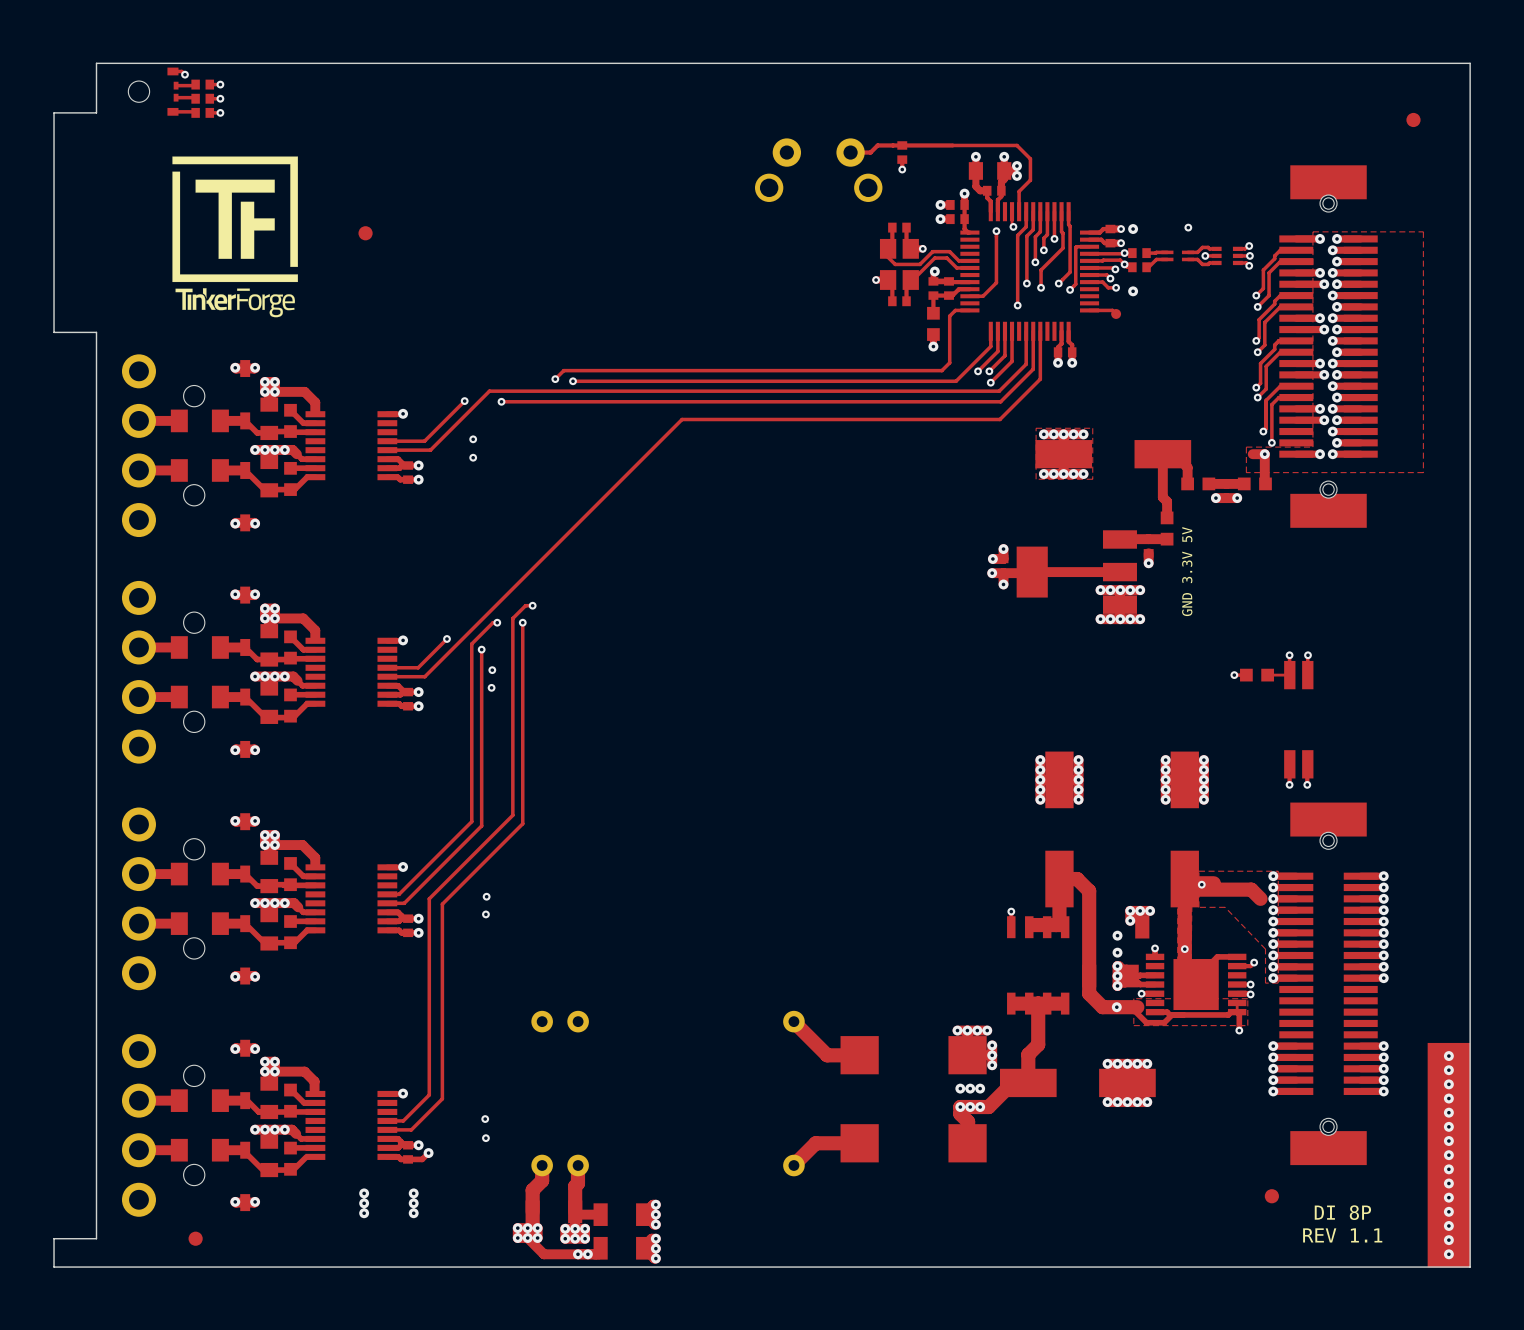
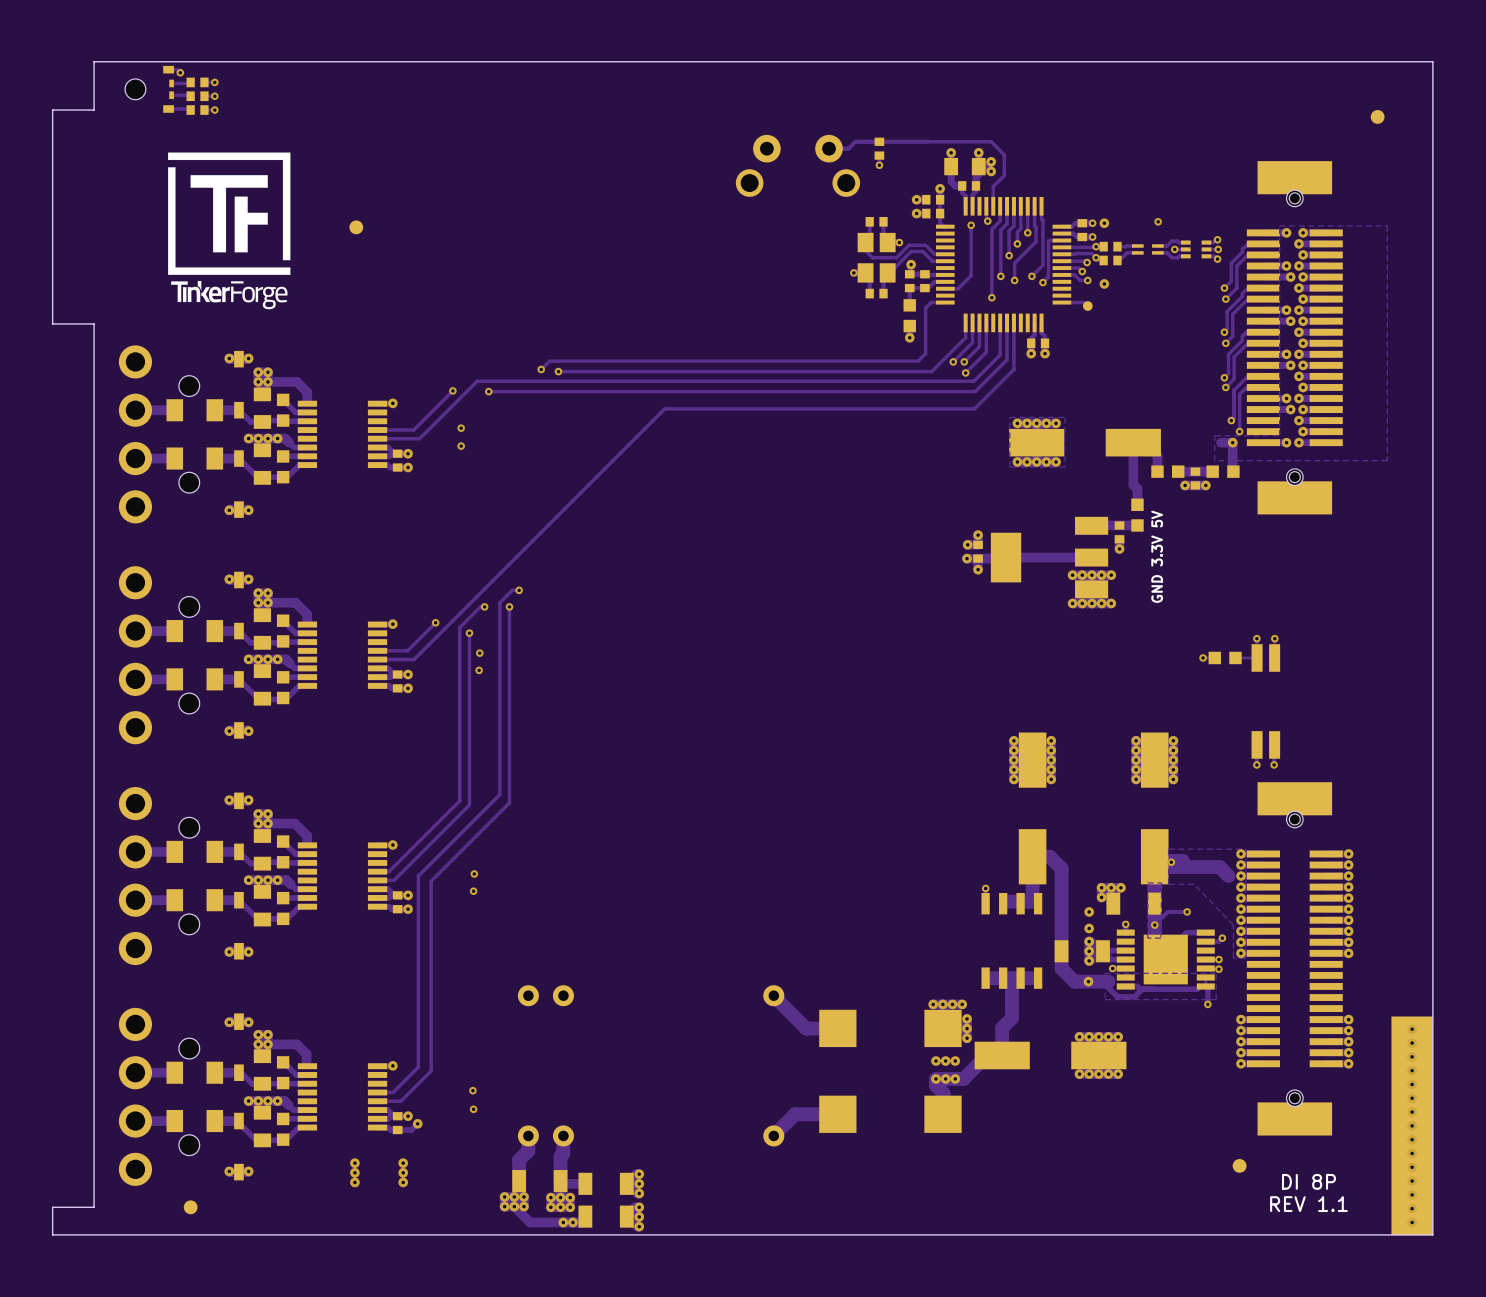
track: none -> (1187, 911) (1167, 911) (1154, 925)
via: none -> (1187, 911)

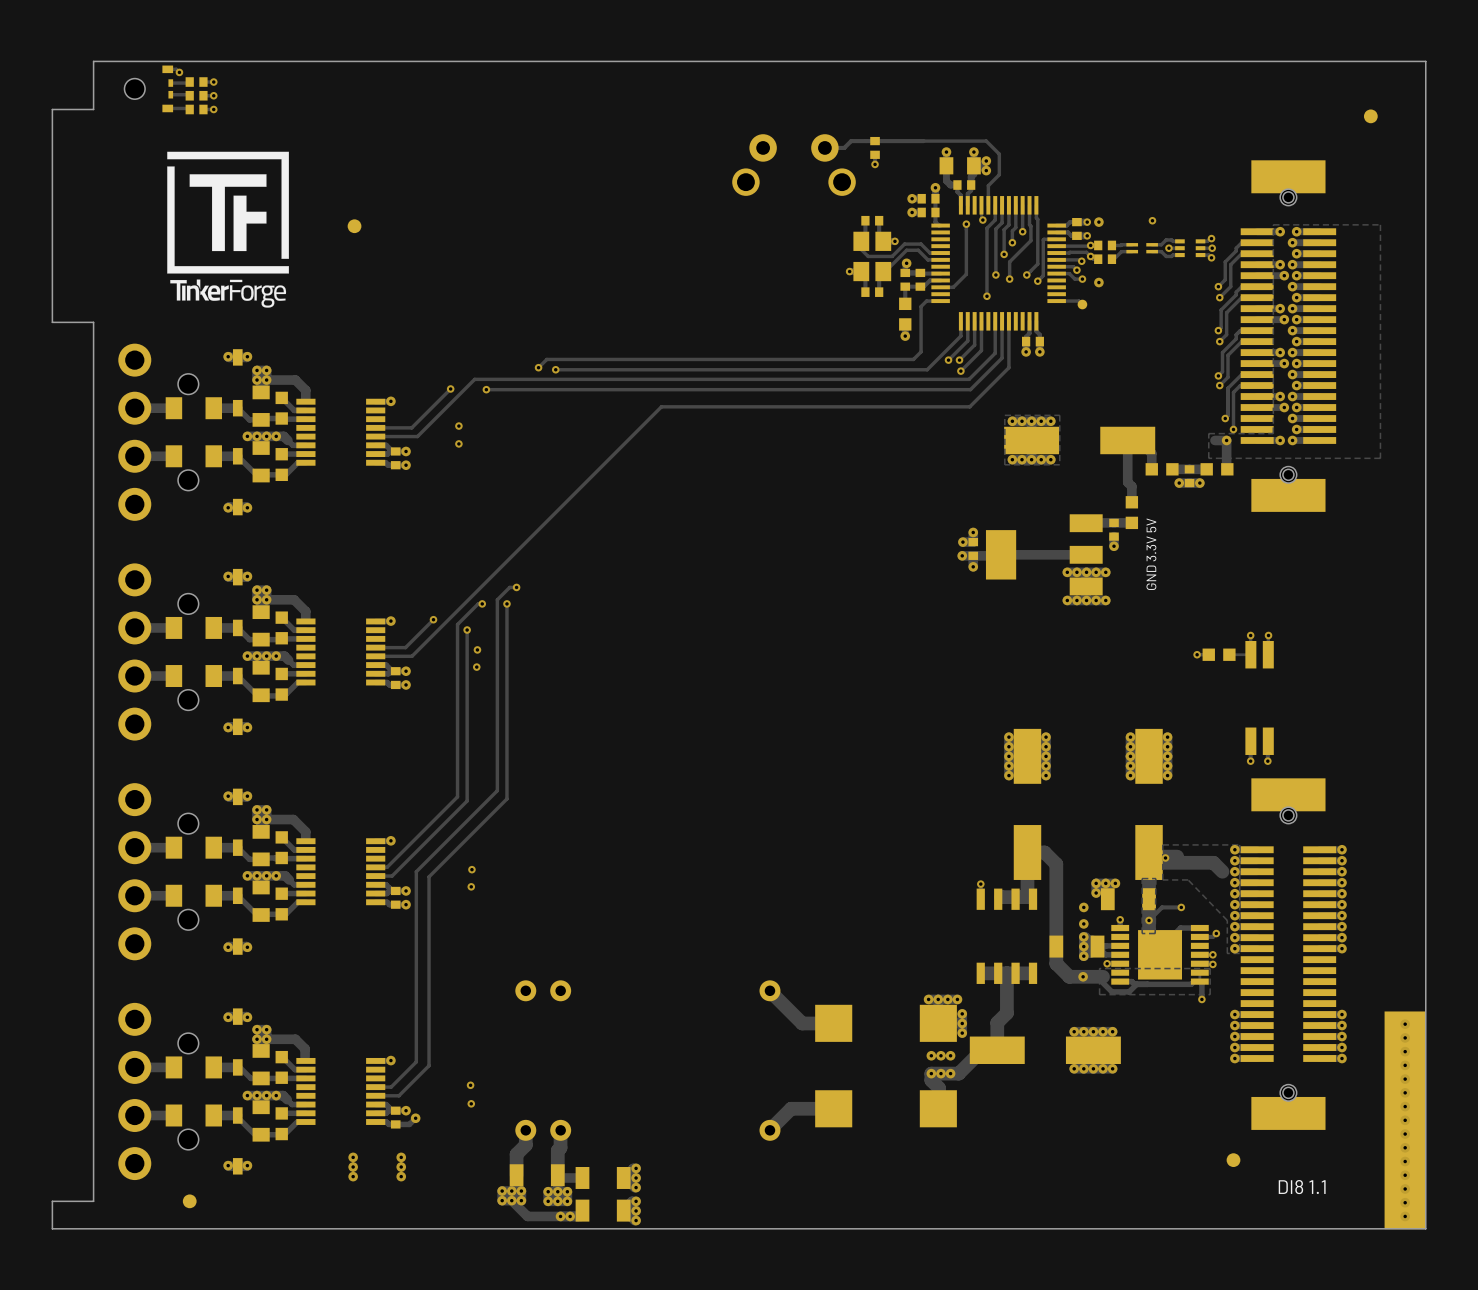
text: DI 8P (1308, 1181) -> none
text: none -> DI8 1.1 (1302, 1187)
text: REV 1.1 (1308, 1204) -> none

